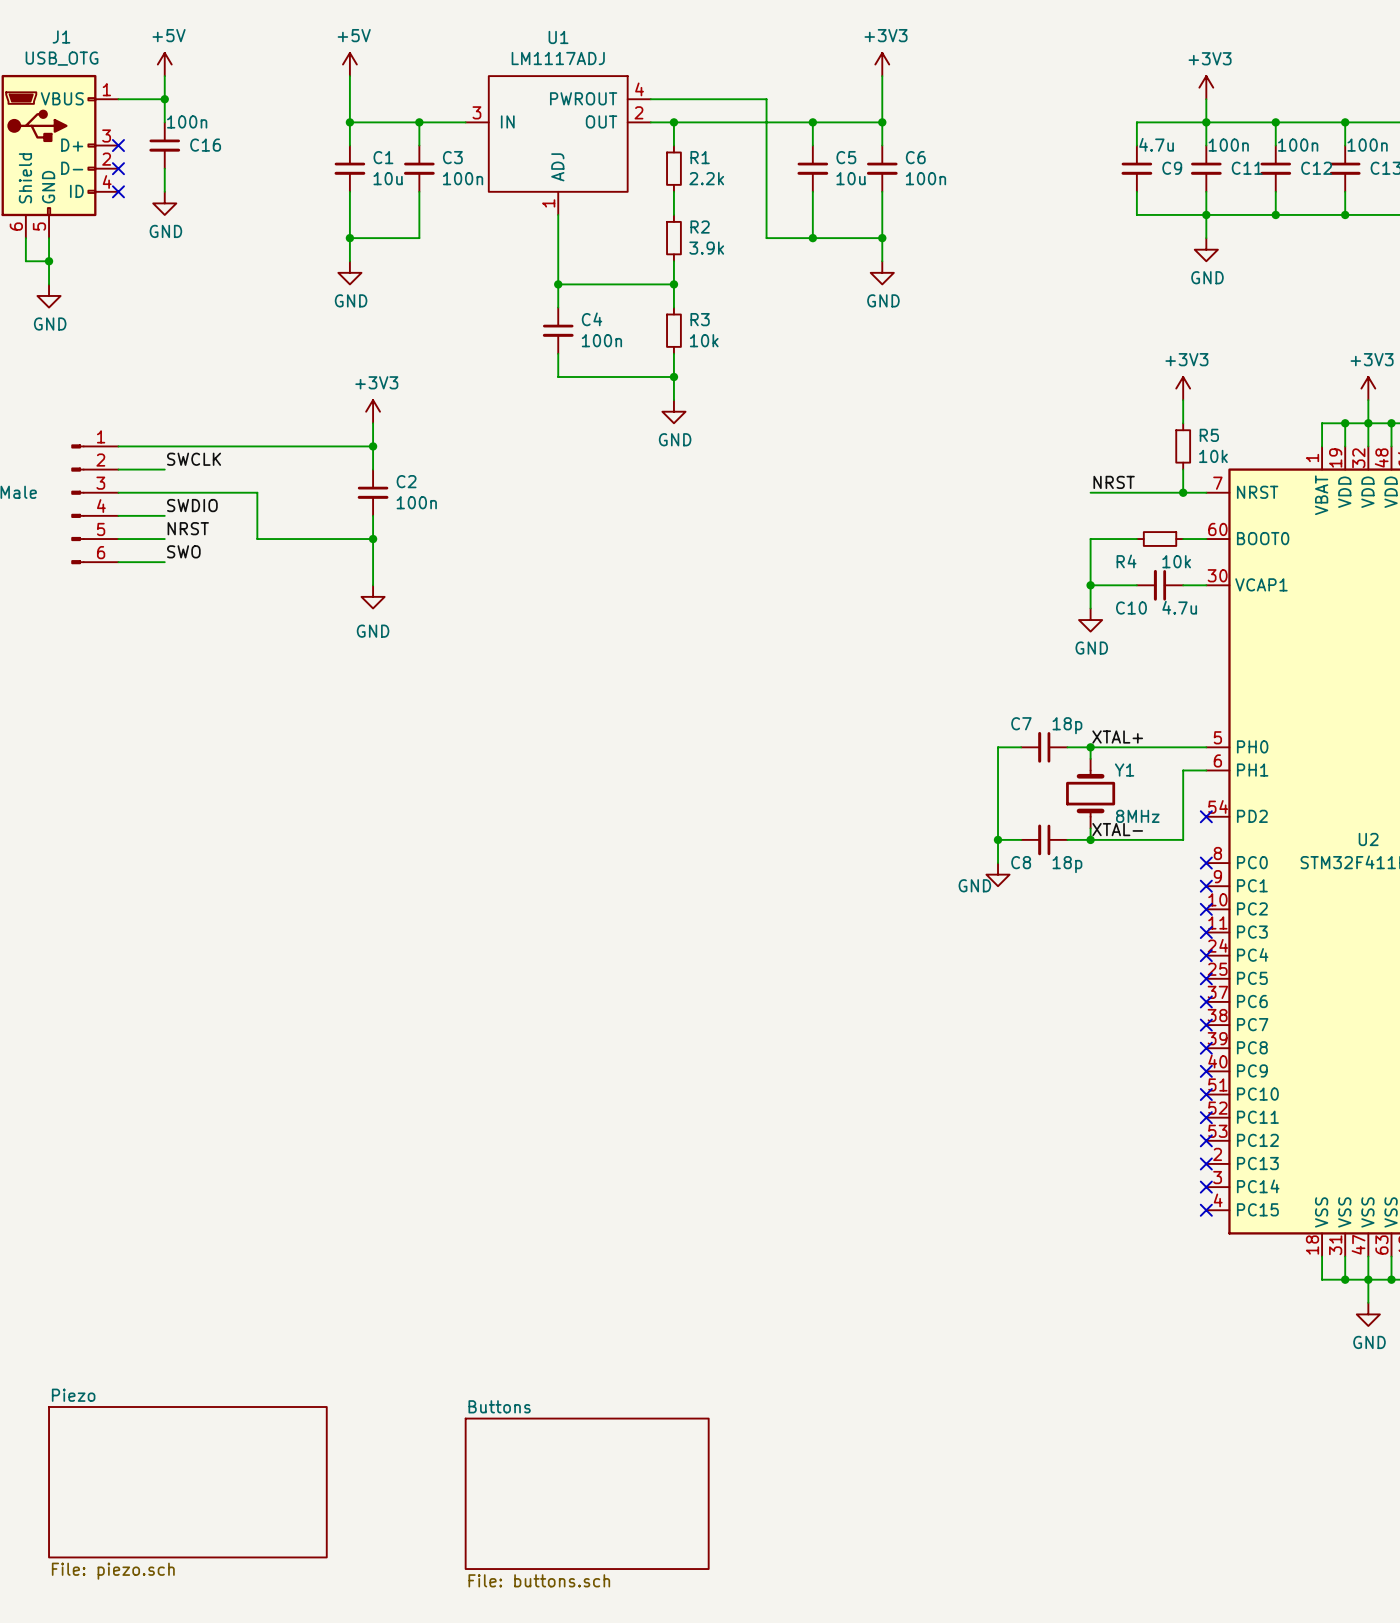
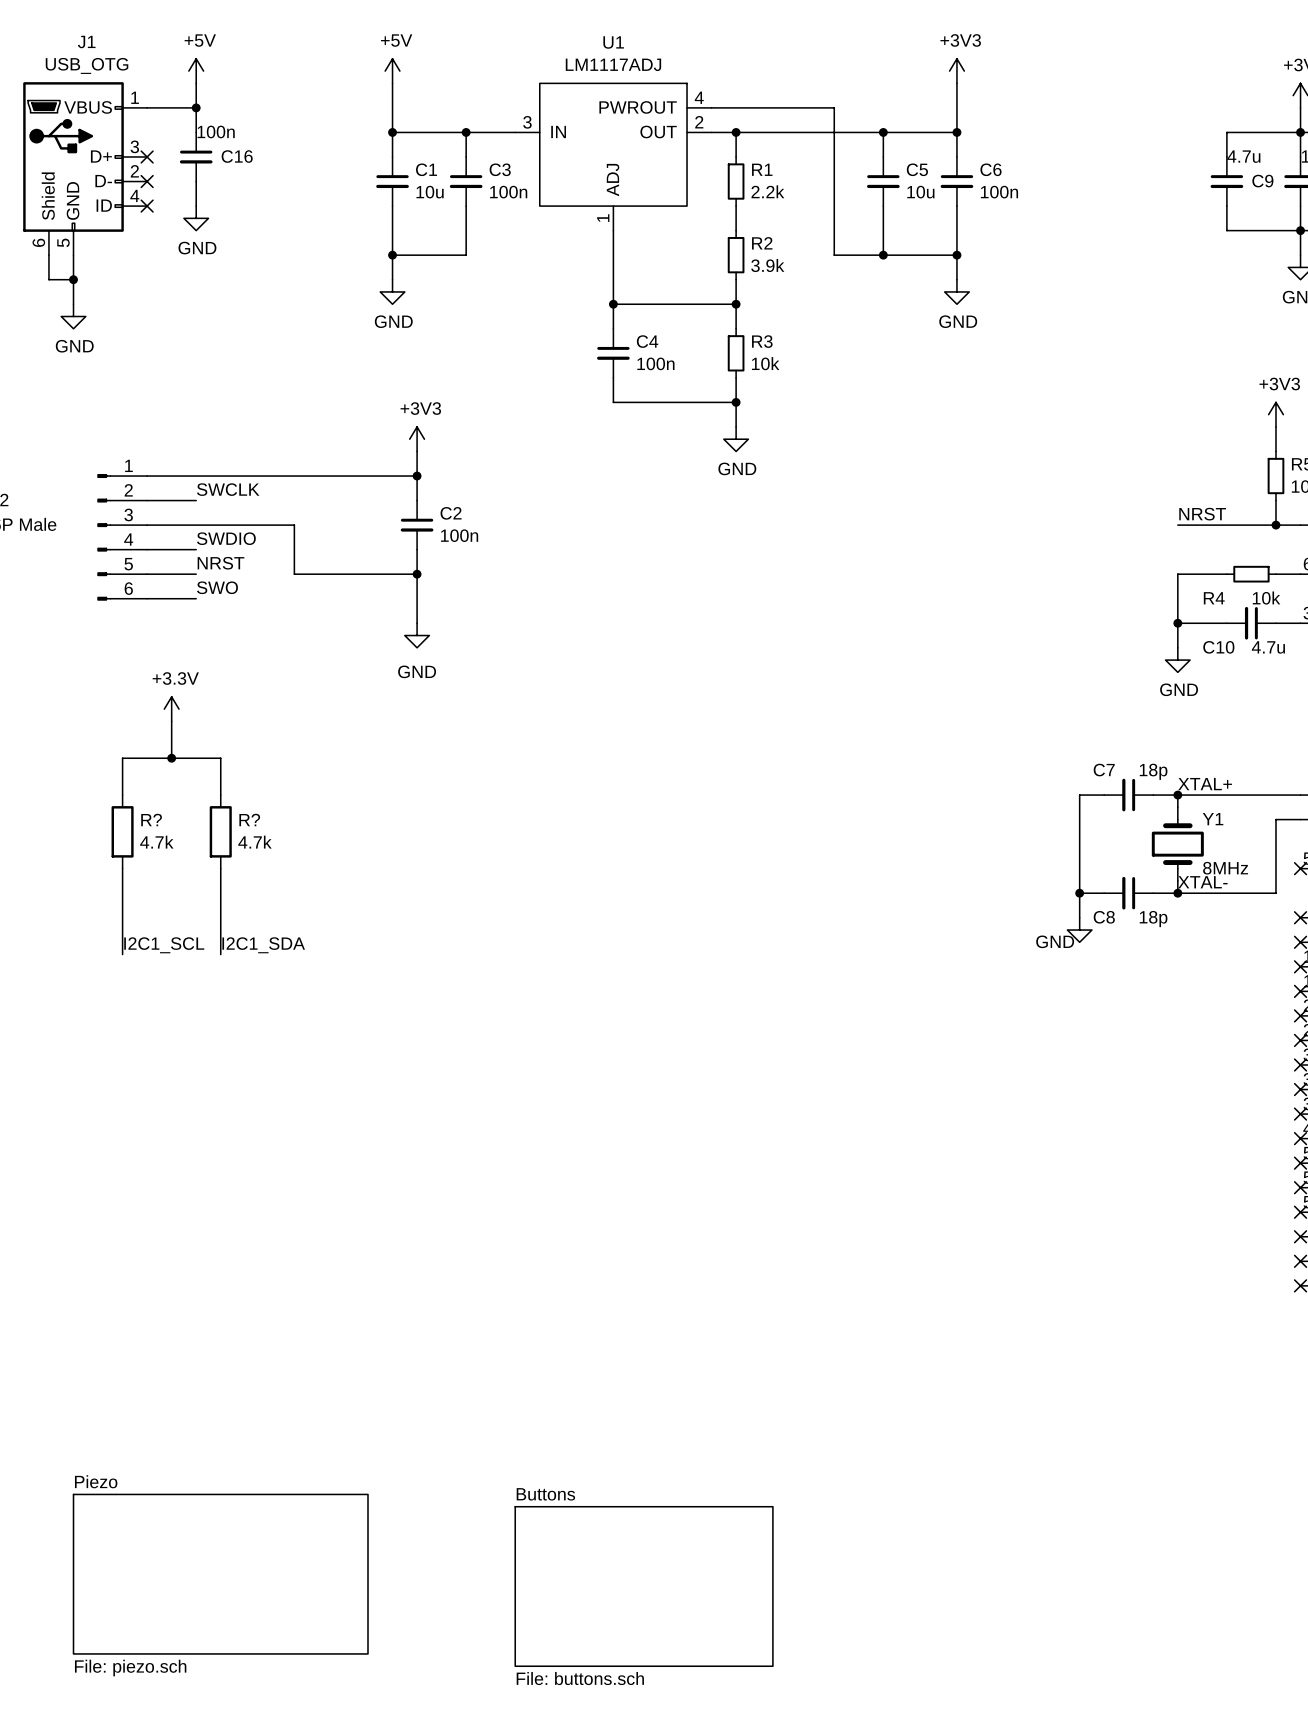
power symbol: none -> +3.3V (171, 709)
wire: none -> (171, 721) (171, 758)
junction: none -> (171, 758)
wire: none -> (122, 795) (122, 758) (220, 758) (220, 795)
R?: none -> 4.7k (122, 831)
R?: none -> 4.7k (220, 831)
wire: none -> (122, 868) (122, 954)
wire: none -> (220, 868) (220, 954)
label: none -> I2C1_SCL (164, 945)
label: none -> I2C1_SDA (263, 945)

